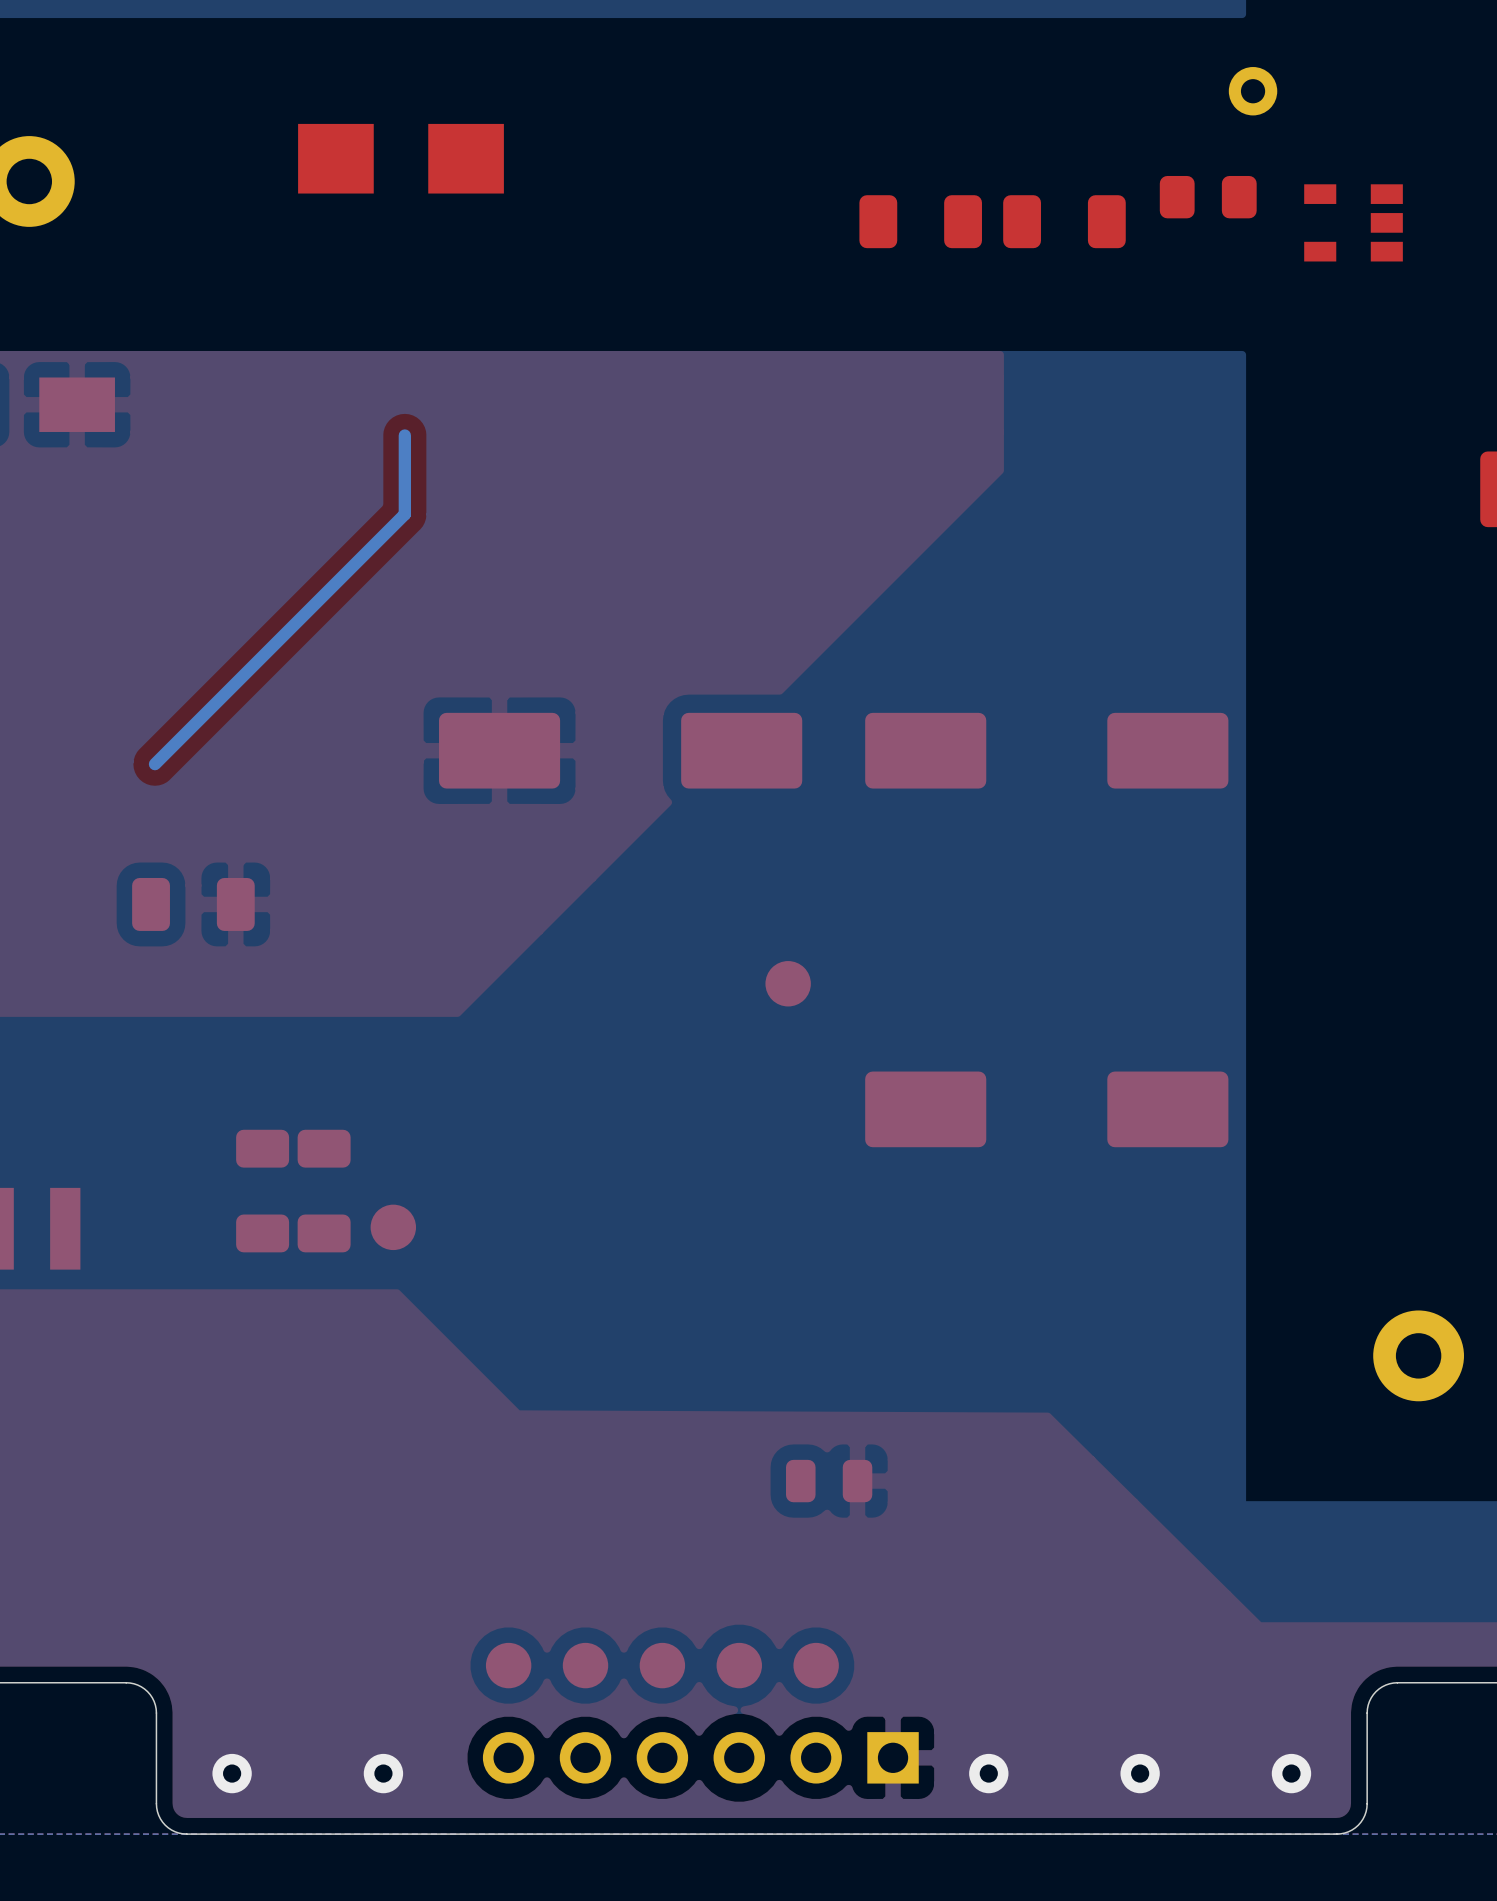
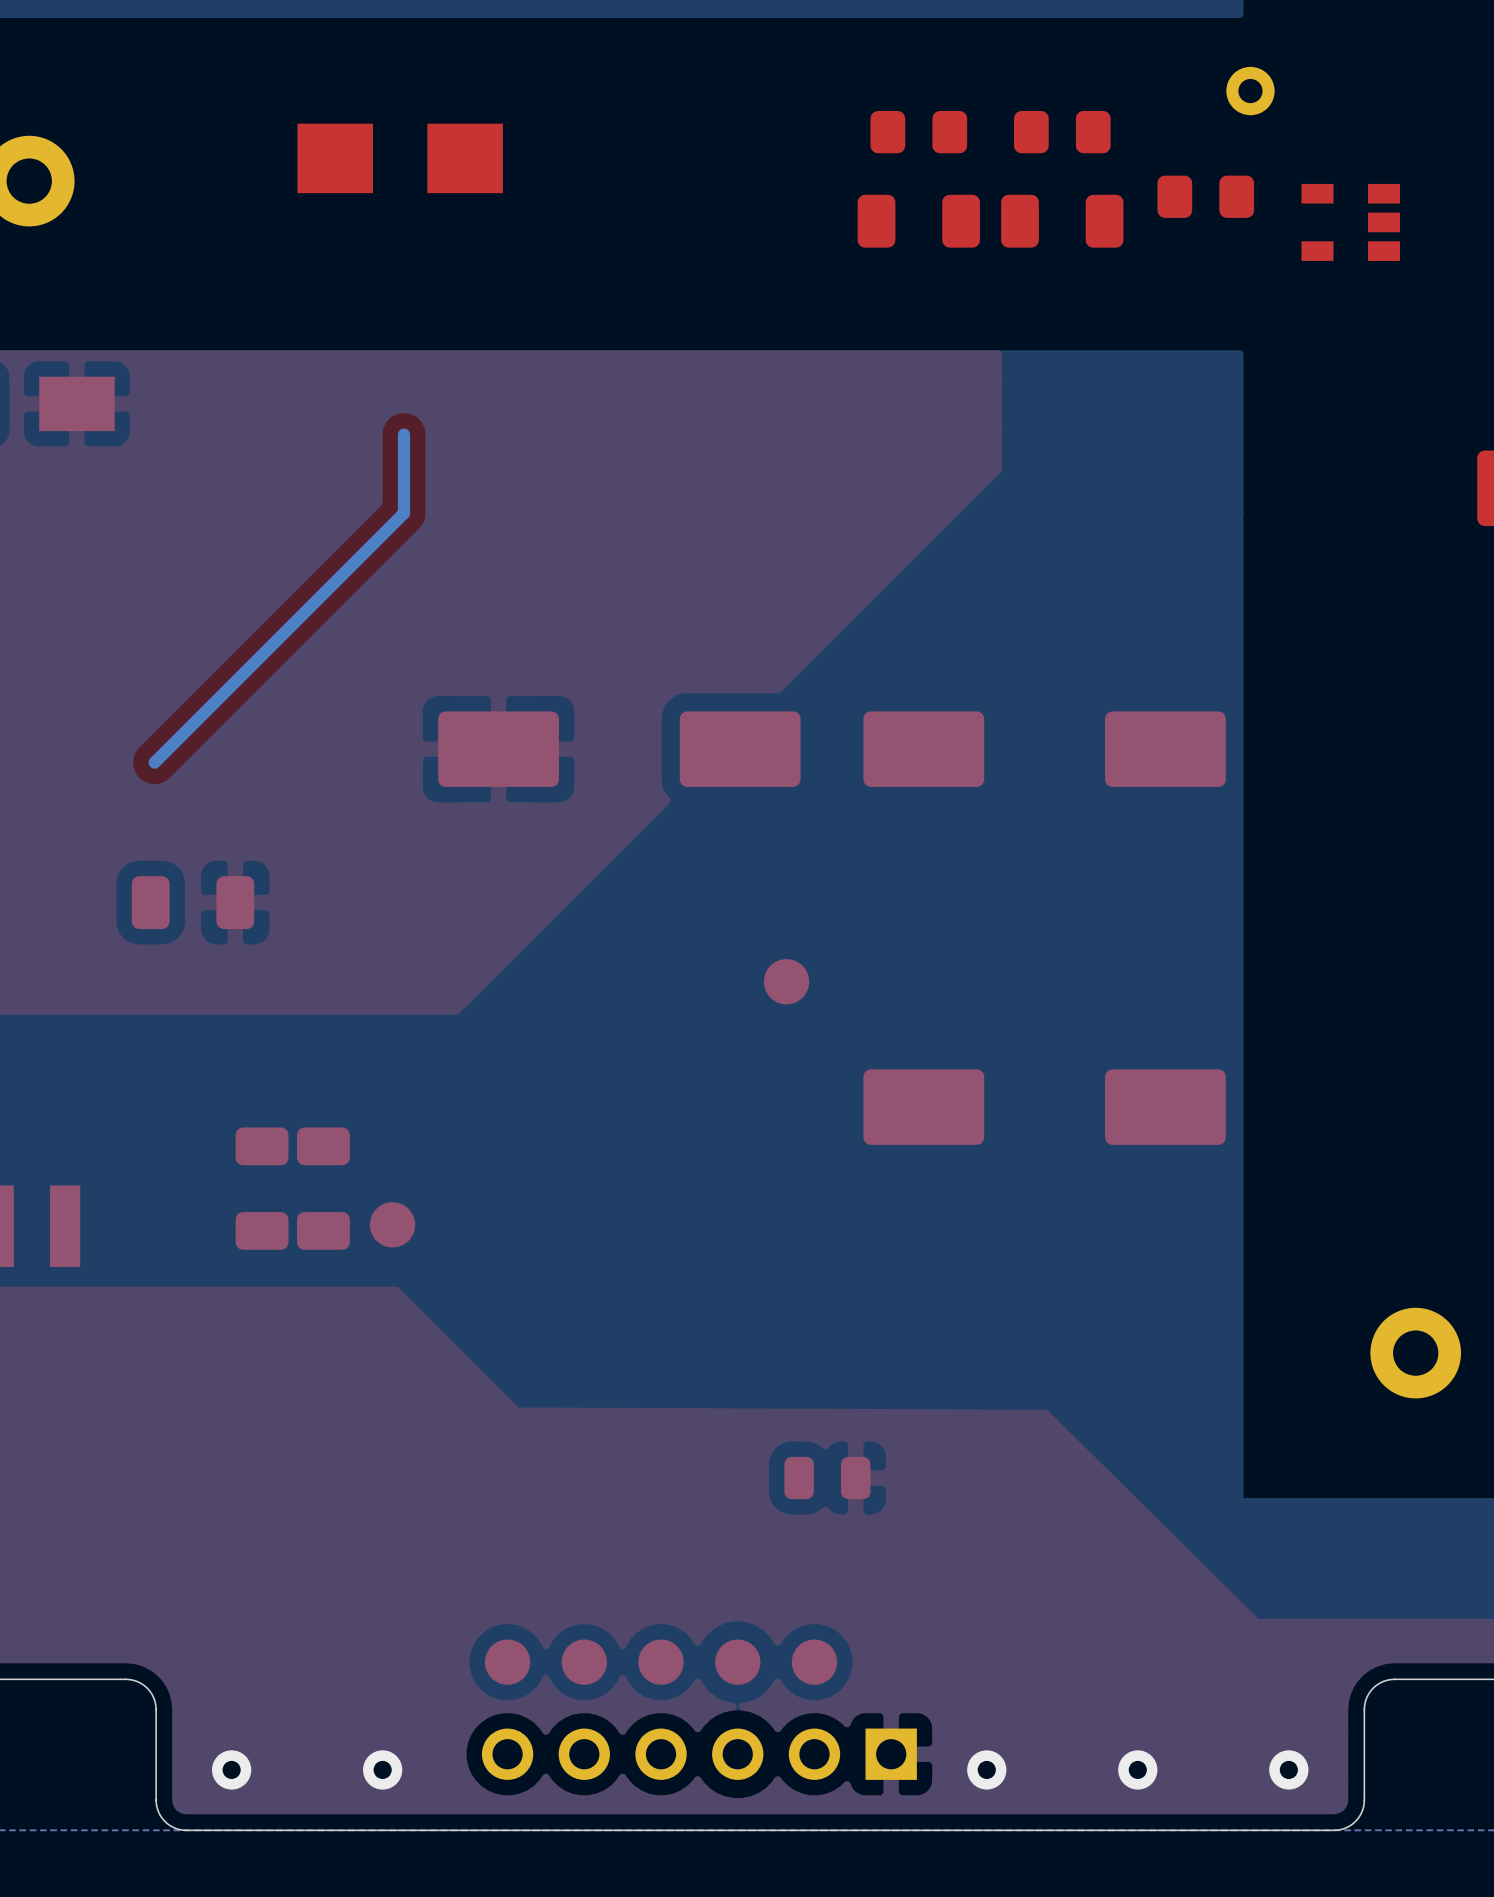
part: none -> (918, 132)
part: none -> (1062, 132)

